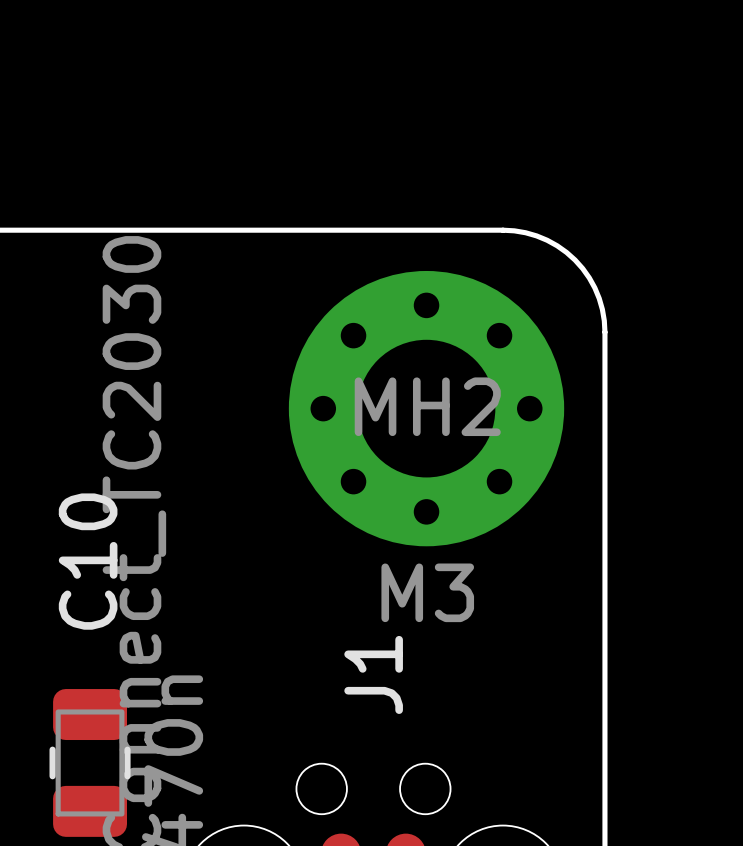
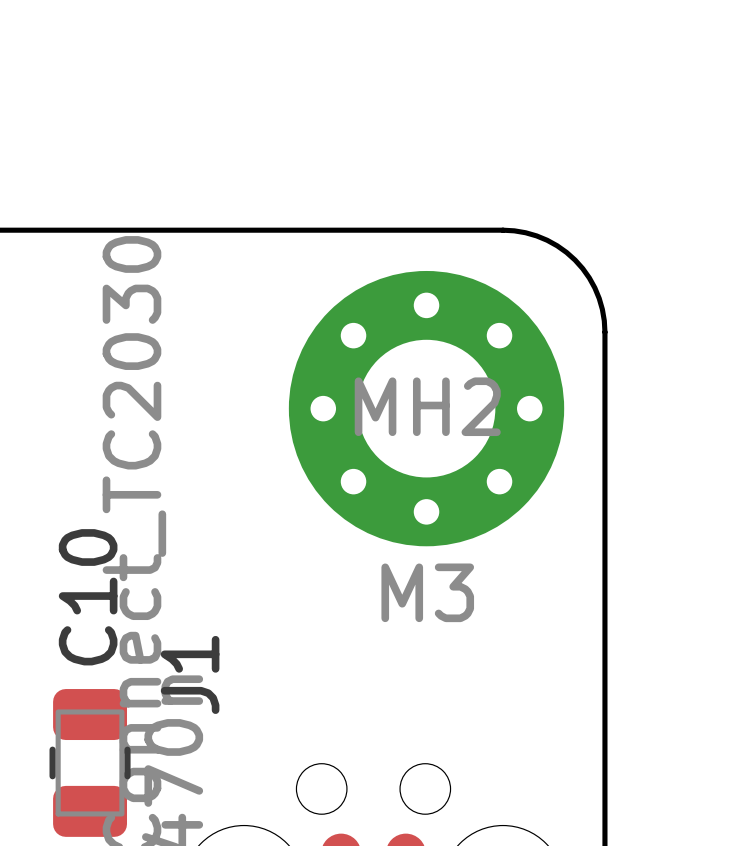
C10 name position: C10 (88, 561) -> C10 (88, 597)
J1 name position: J1 (373, 674) -> J1 (190, 674)

